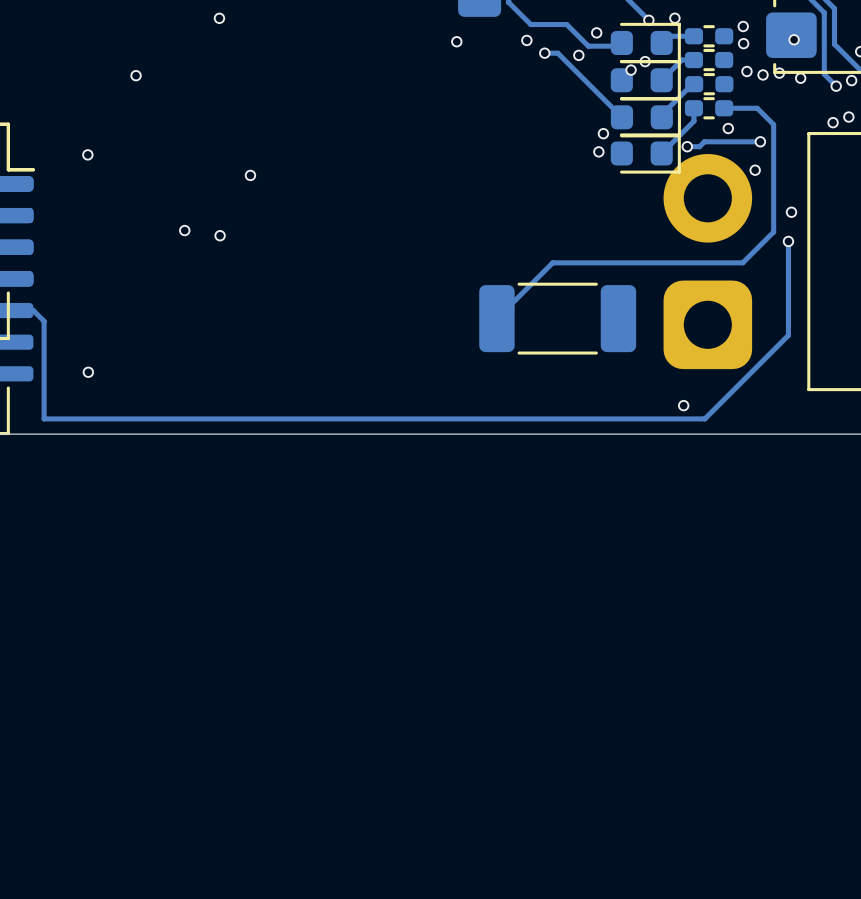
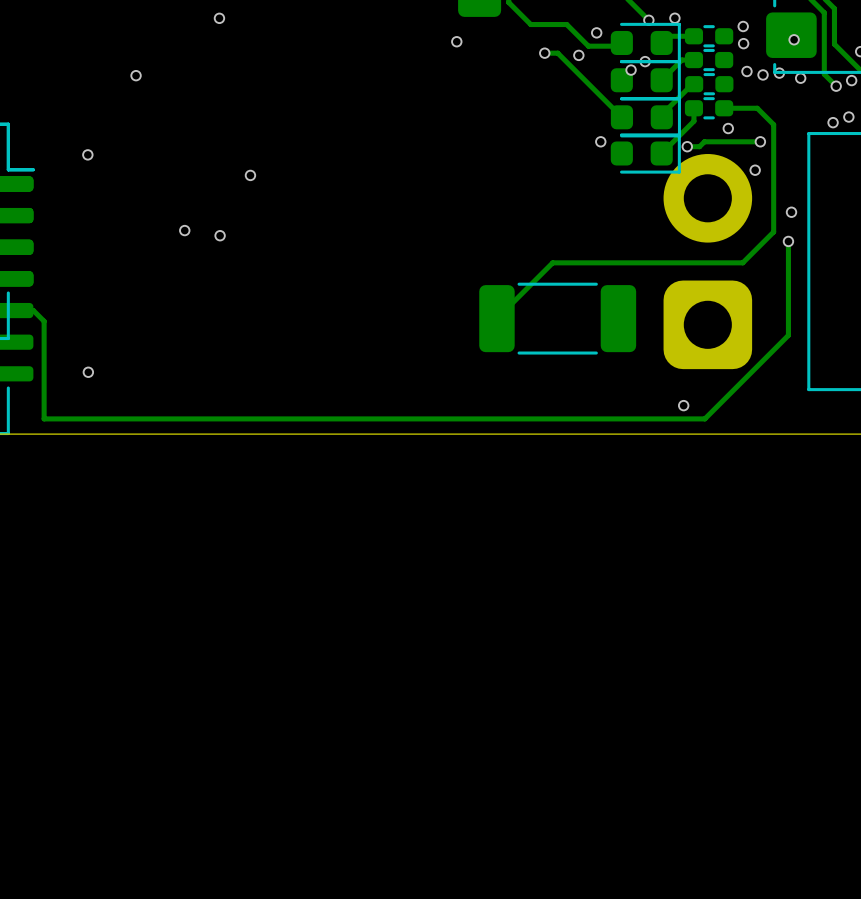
via: (526, 40) -> none
via: (603, 133) -> none
via: none -> (600, 141)
via: (598, 151) -> none

